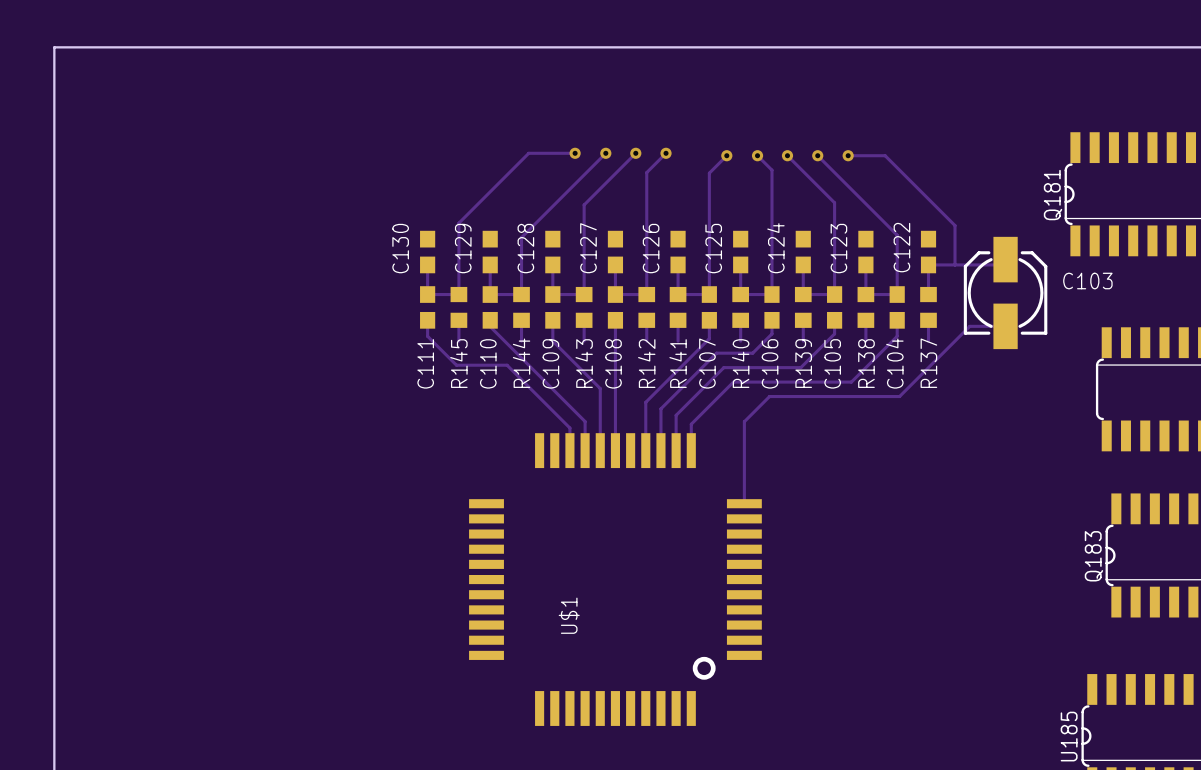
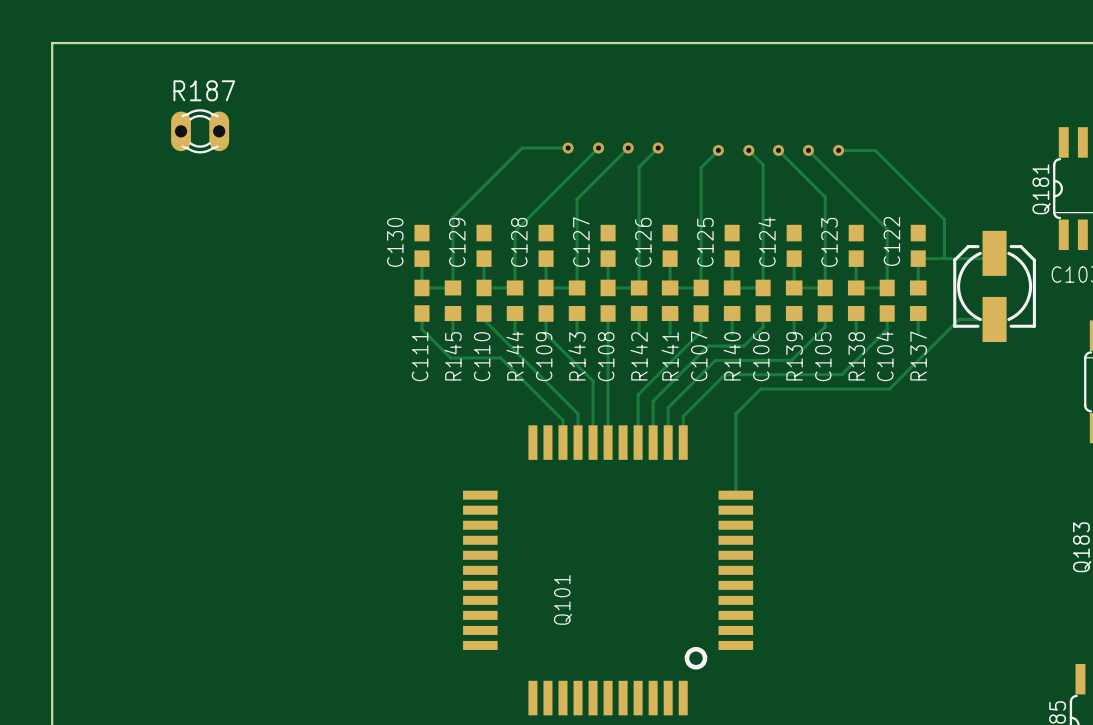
R187: none -> (200, 131)
U$1 name: U$1 (569, 615) -> Q101 (562, 599)

